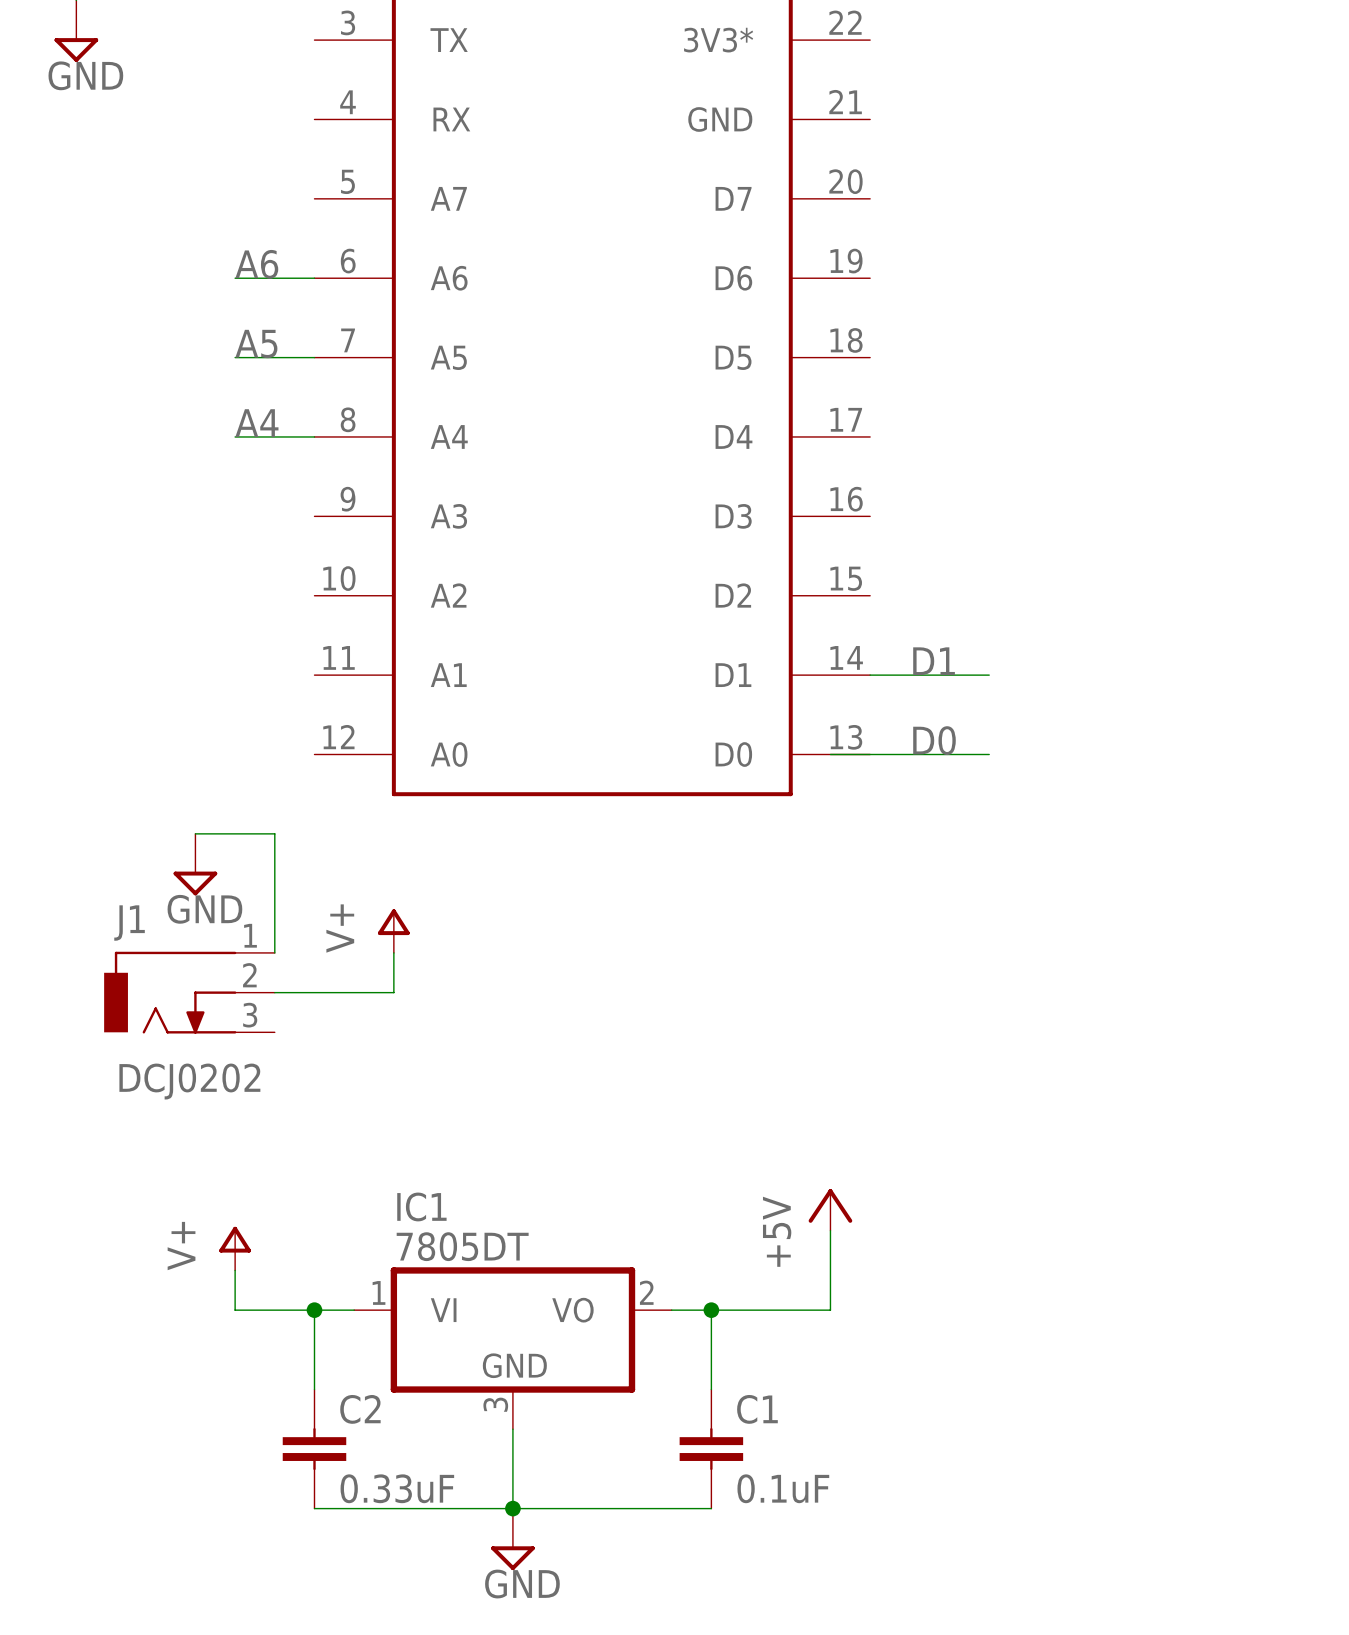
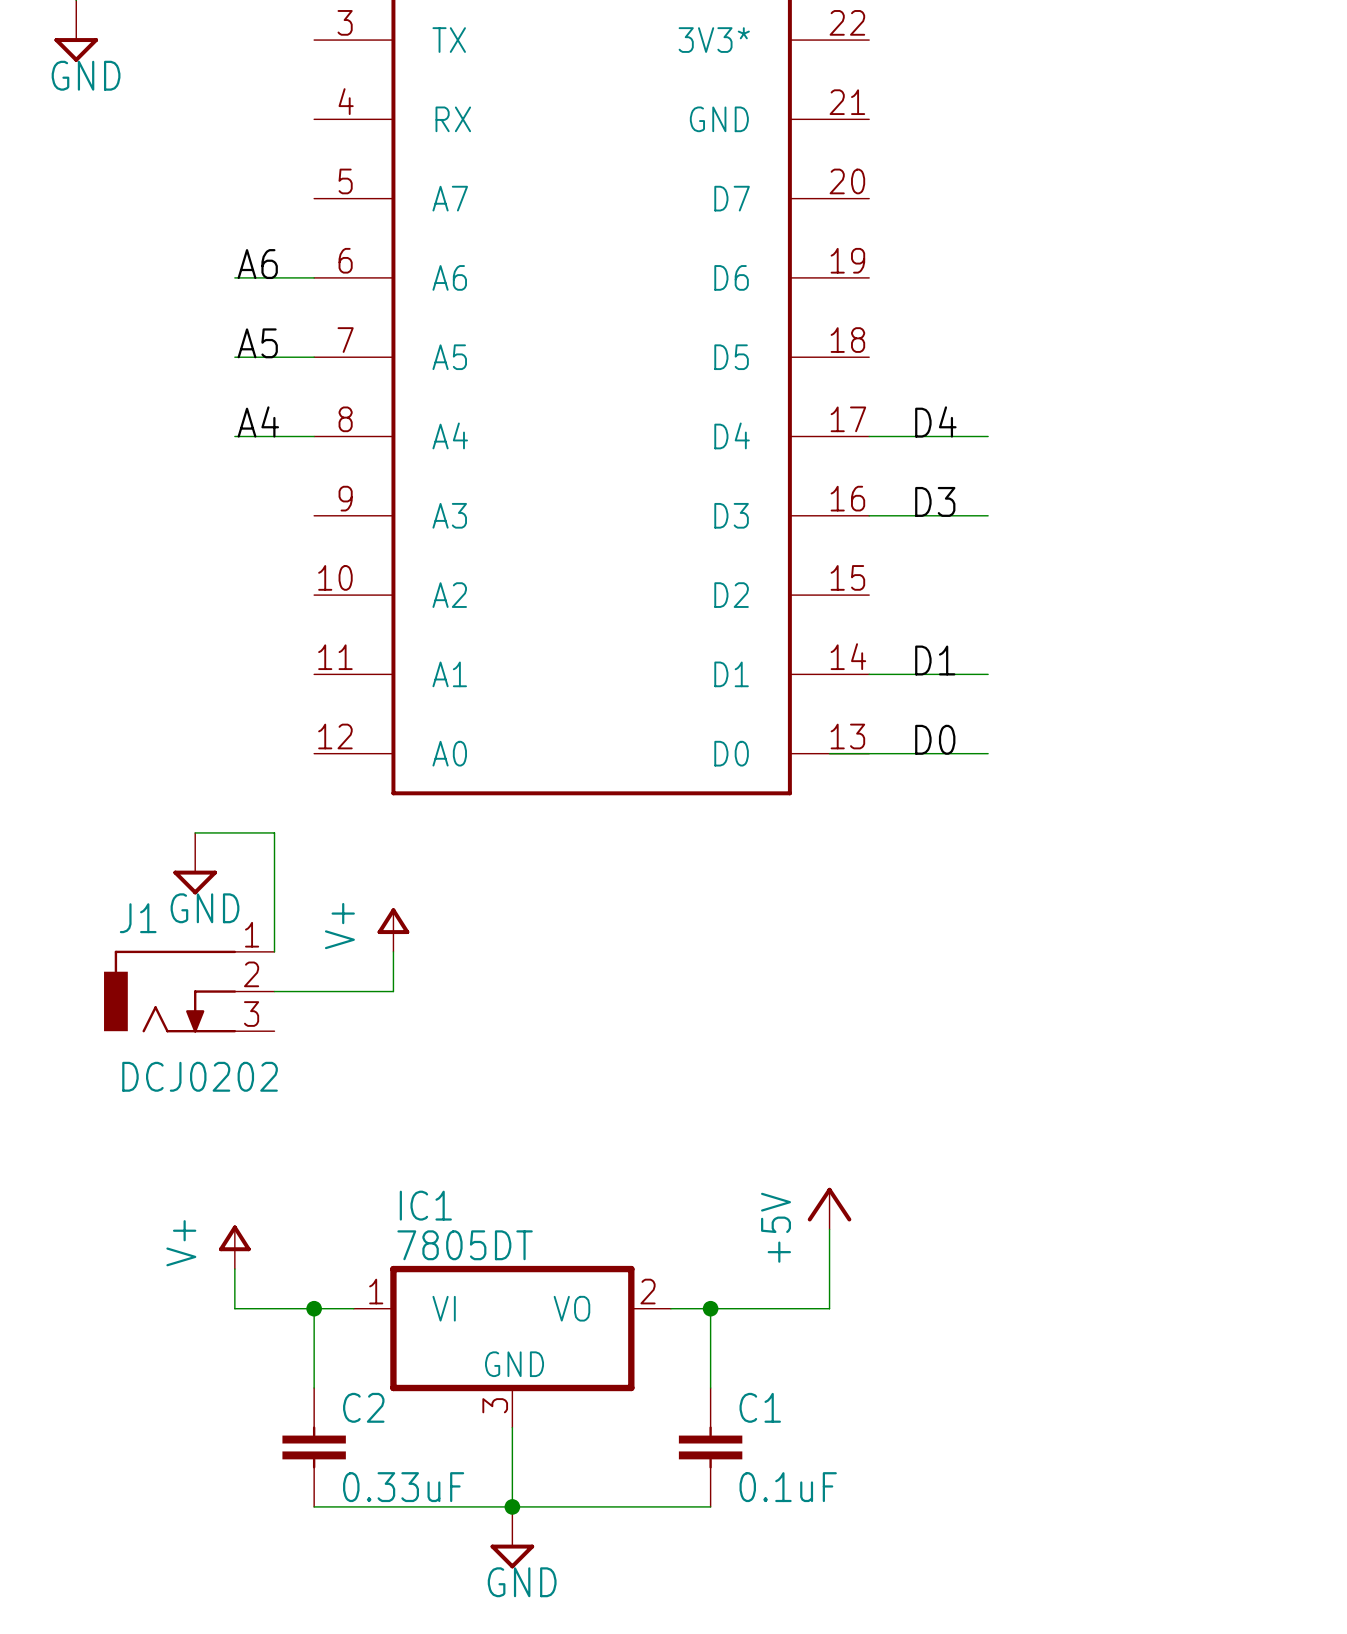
label: none -> D4 (935, 421)
wire: none -> (869, 436) (988, 436)
label: none -> D3 (935, 501)
wire: none -> (869, 515) (988, 515)

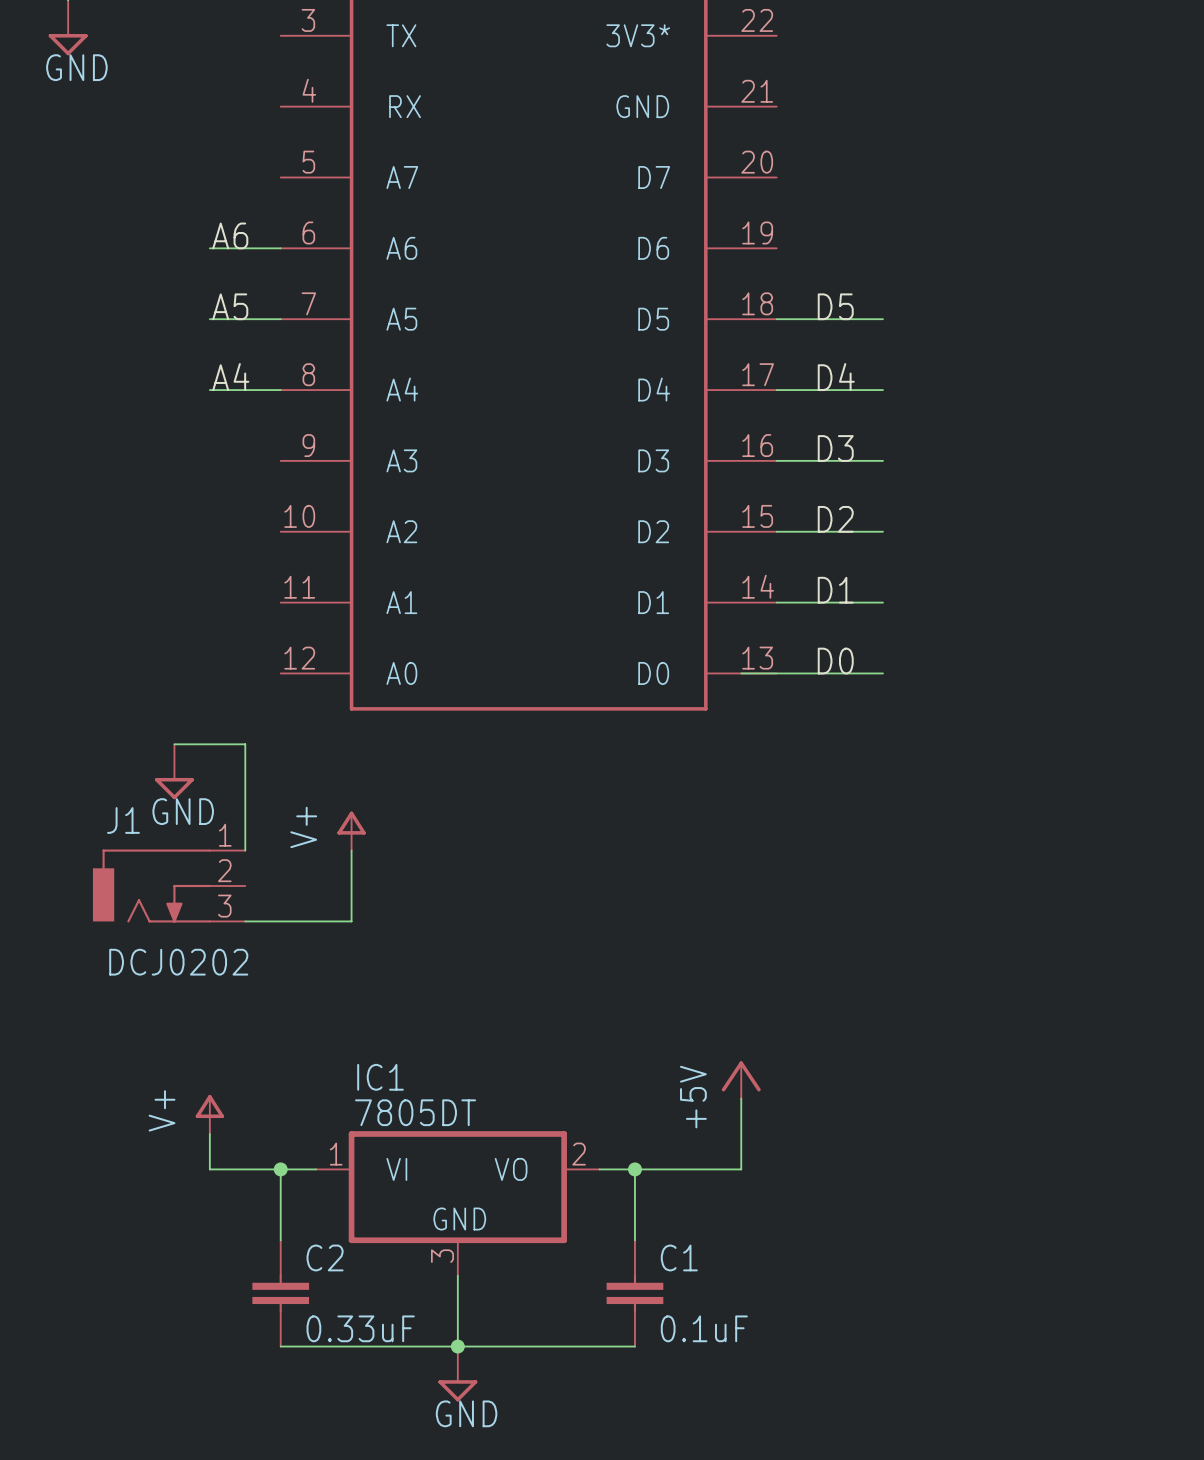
label: none -> D5 (835, 306)
wire: none -> (776, 319) (882, 319)
label: none -> D2 (835, 519)
wire: none -> (776, 531) (882, 531)
wire: (274, 991) (393, 991) -> (245, 921) (351, 921) (351, 886)

